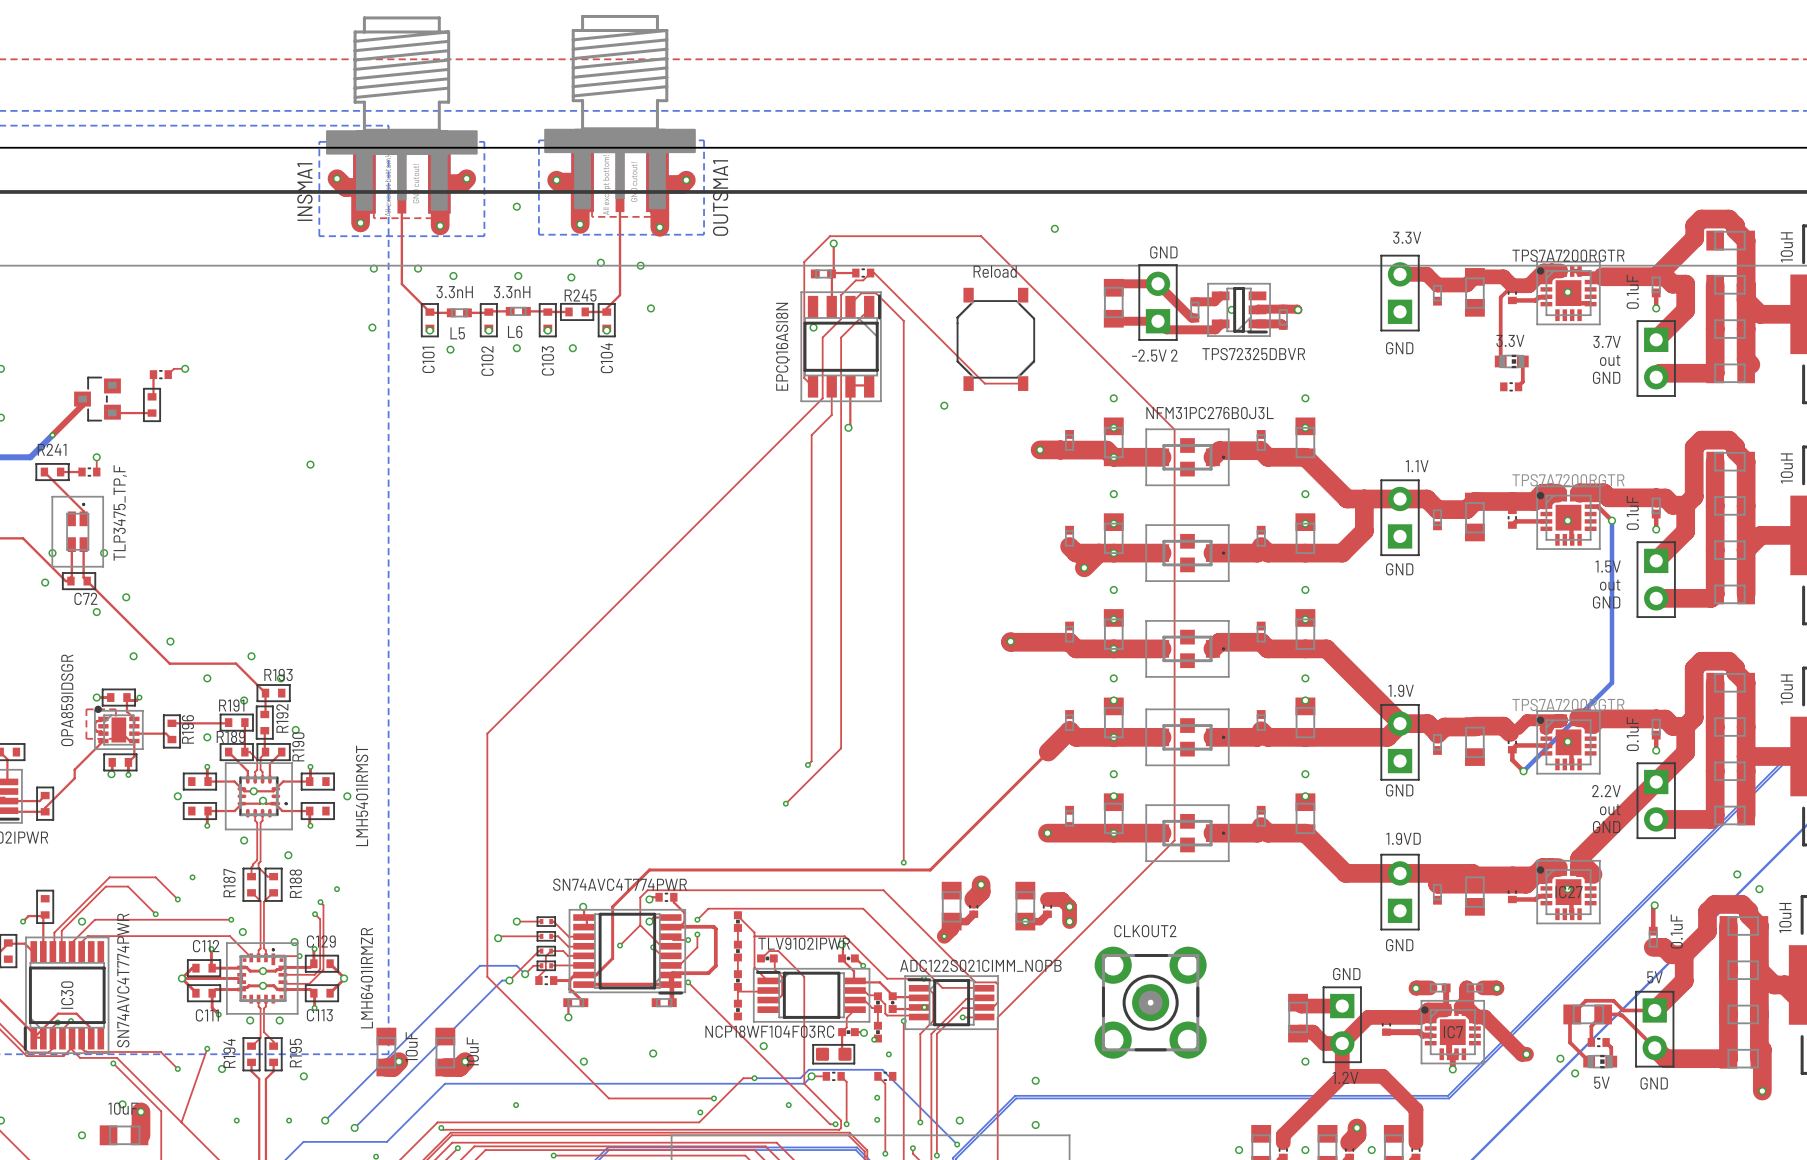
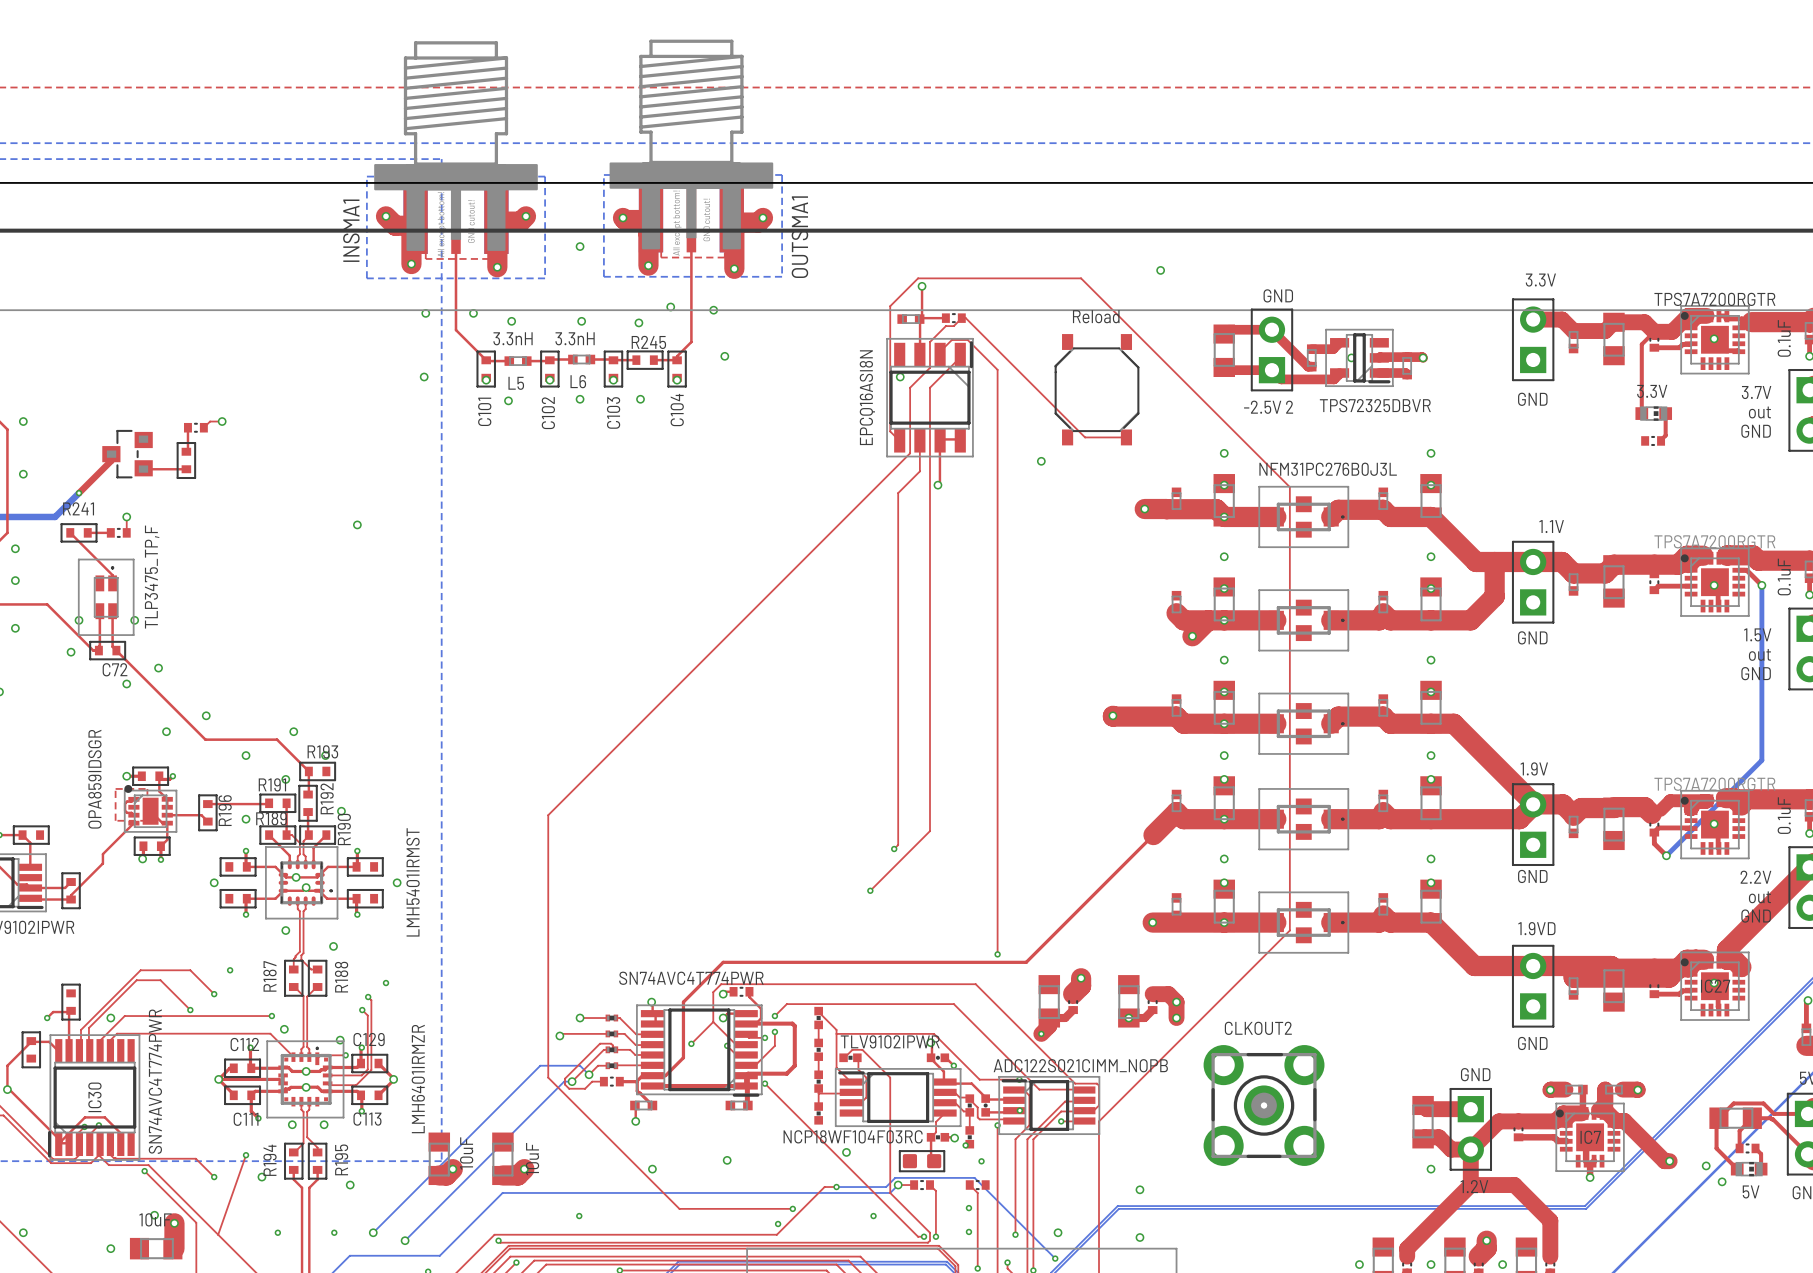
part footprint: [537, 916, 556, 927] -> [605, 1014, 619, 1022]
part footprint: [537, 931, 556, 942] -> [605, 1030, 619, 1038]
part footprint: [537, 946, 556, 956] -> [605, 1046, 619, 1054]
top track: (551, 951) (545, 956) (545, 969) (538, 976) (538, 980) -> (617, 1049) (611, 1043) (600, 1043) (565, 1078) (565, 1084) (569, 1088) (585, 1088) (592, 1081) (603, 1081)
part footprint: [537, 961, 556, 971] -> [605, 1062, 619, 1070]

